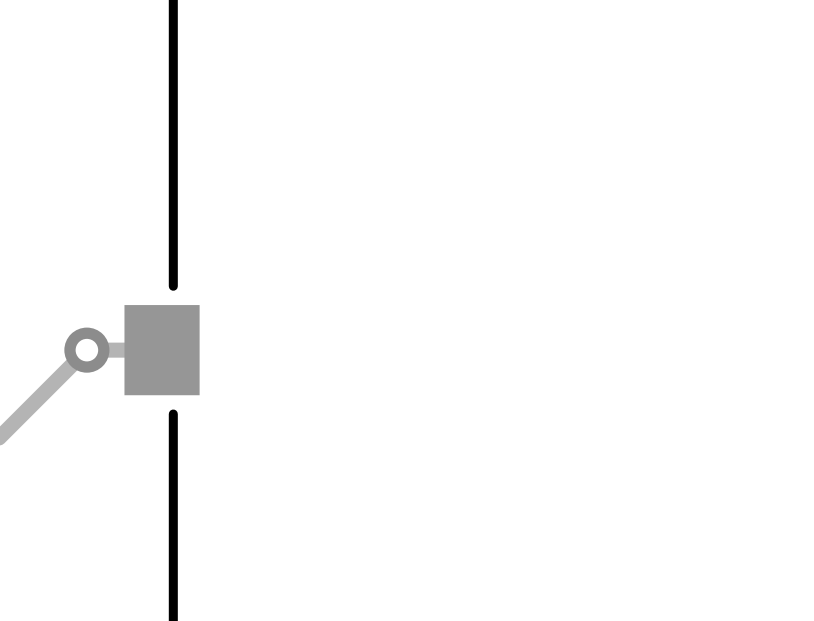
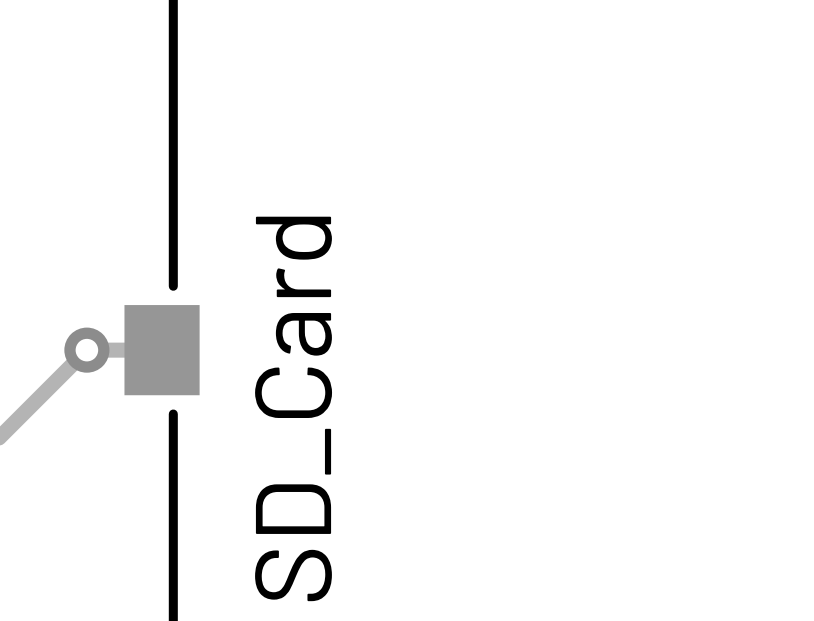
text: none -> SD_Card (293, 408)

